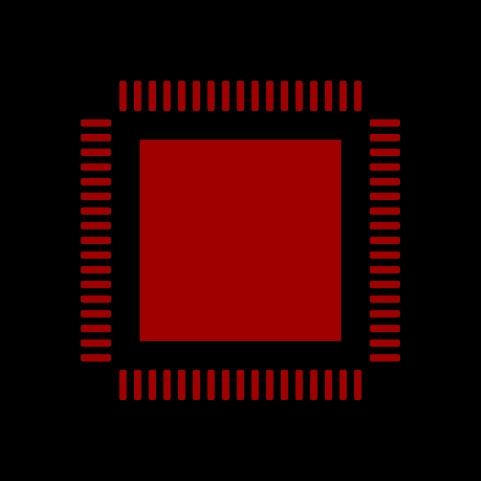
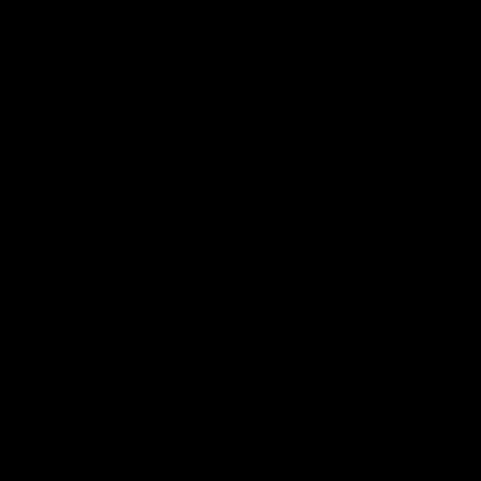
part: (240, 240) -> none

